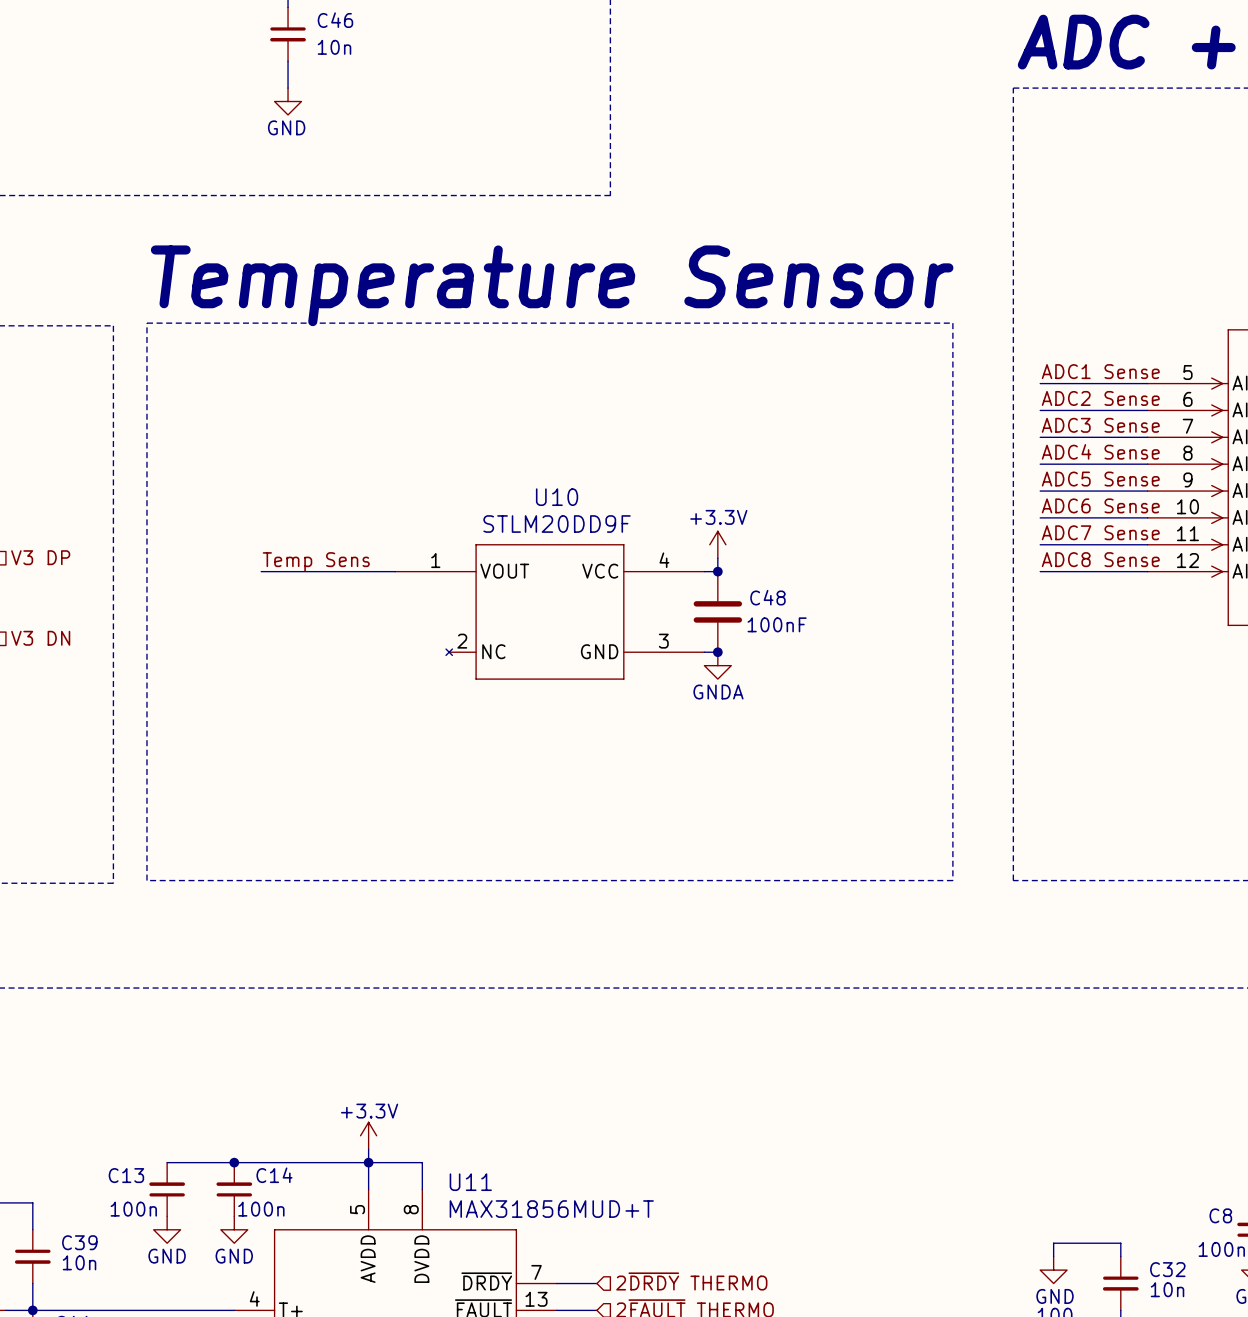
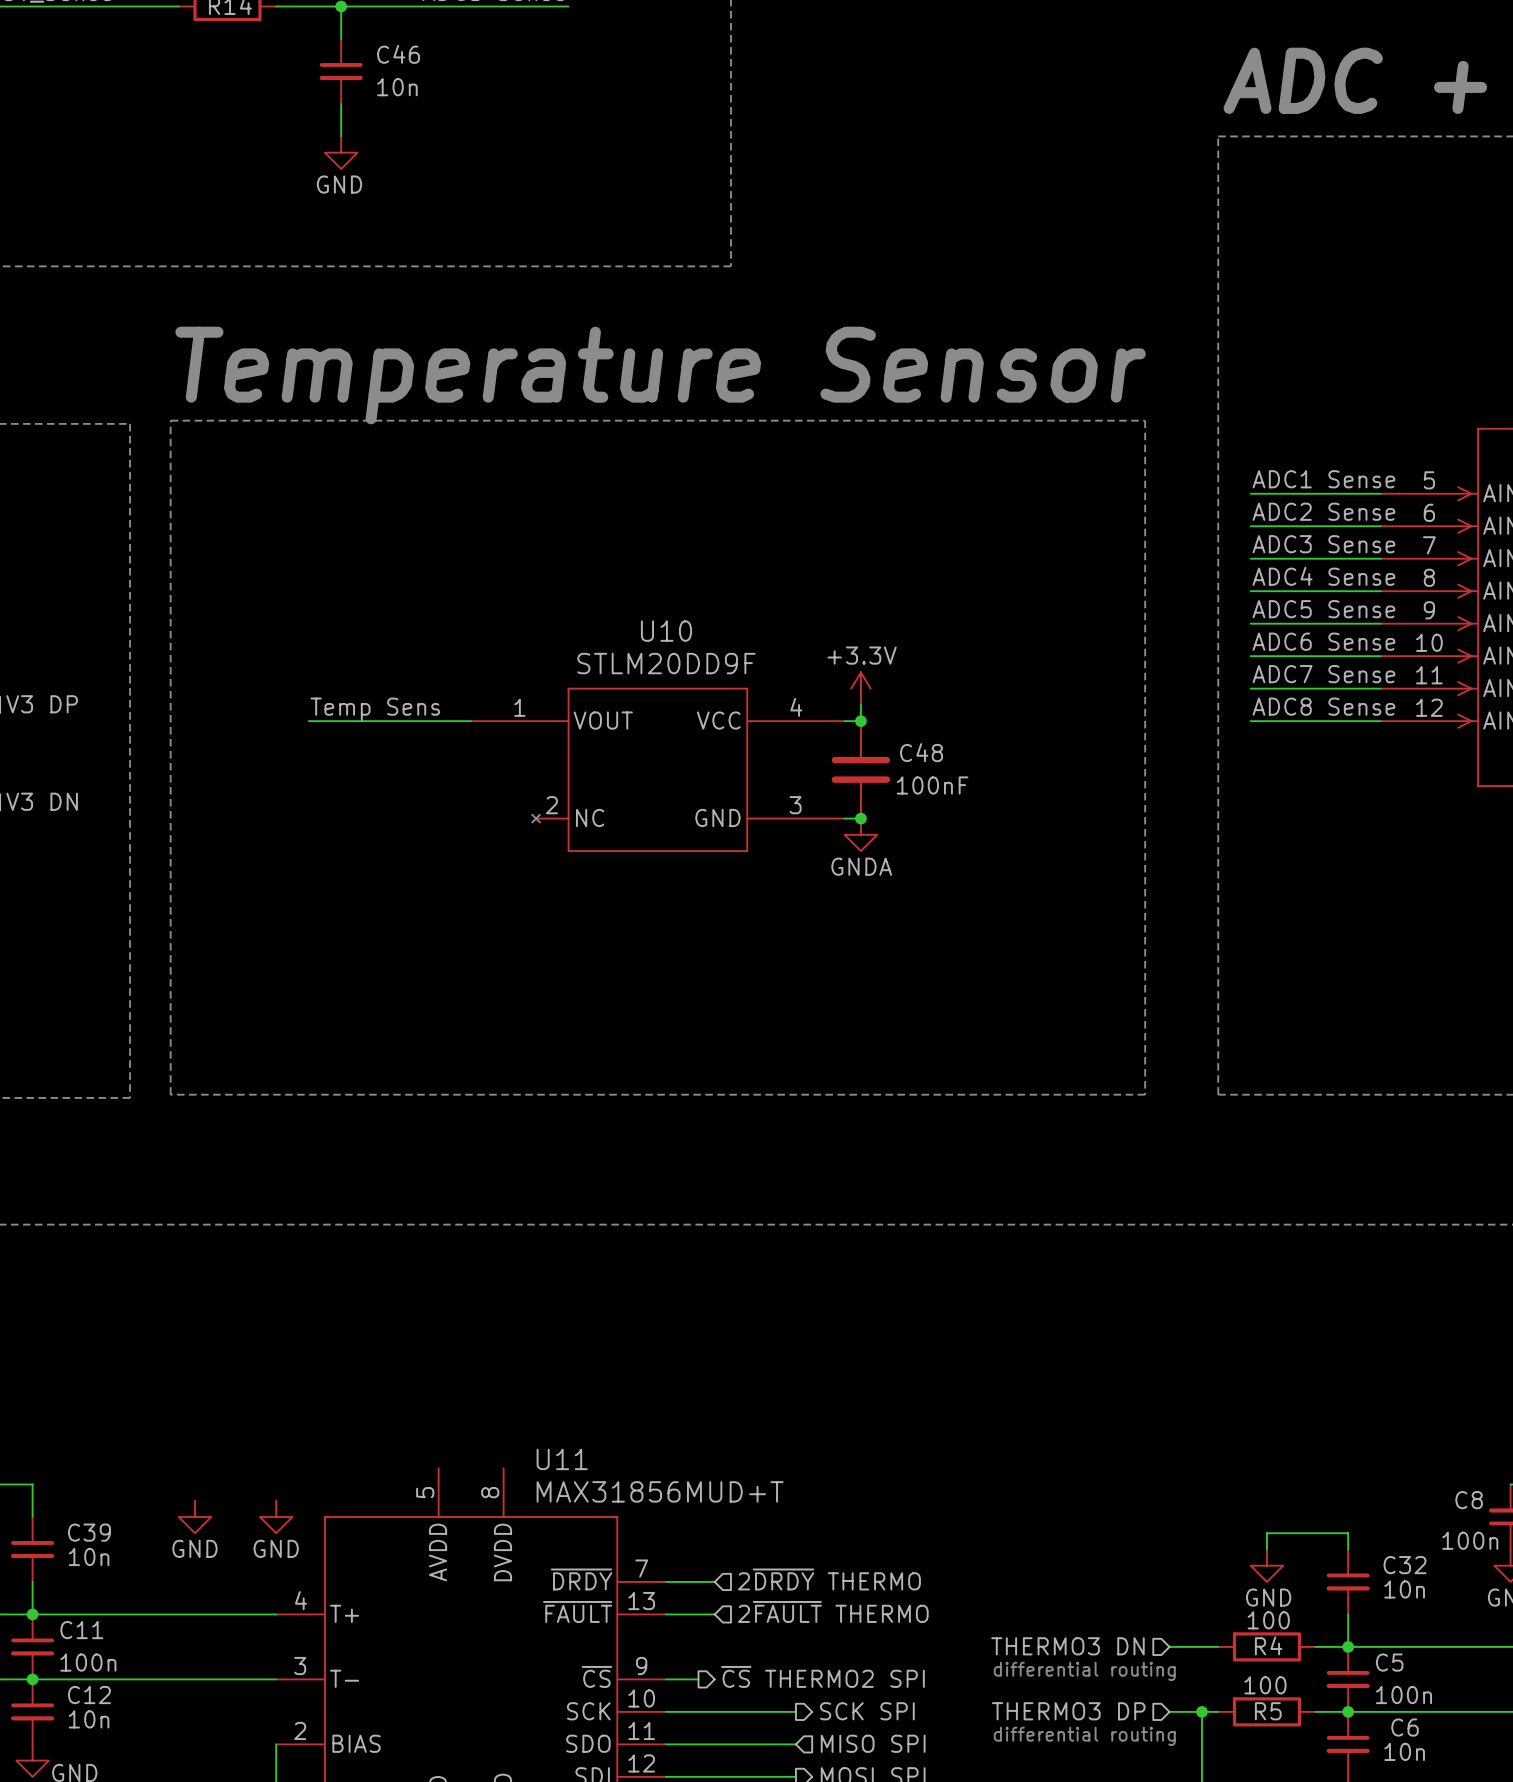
power symbol: +3.3V (368, 1135) -> none
wire: (368, 1149) (368, 1189) -> none
wire: (167, 1162) (422, 1162) (422, 1189) -> none
junction: (234, 1162) -> none
junction: (368, 1162) -> none
C13: 100n (167, 1189) -> none
C14: 100n (234, 1189) -> none

